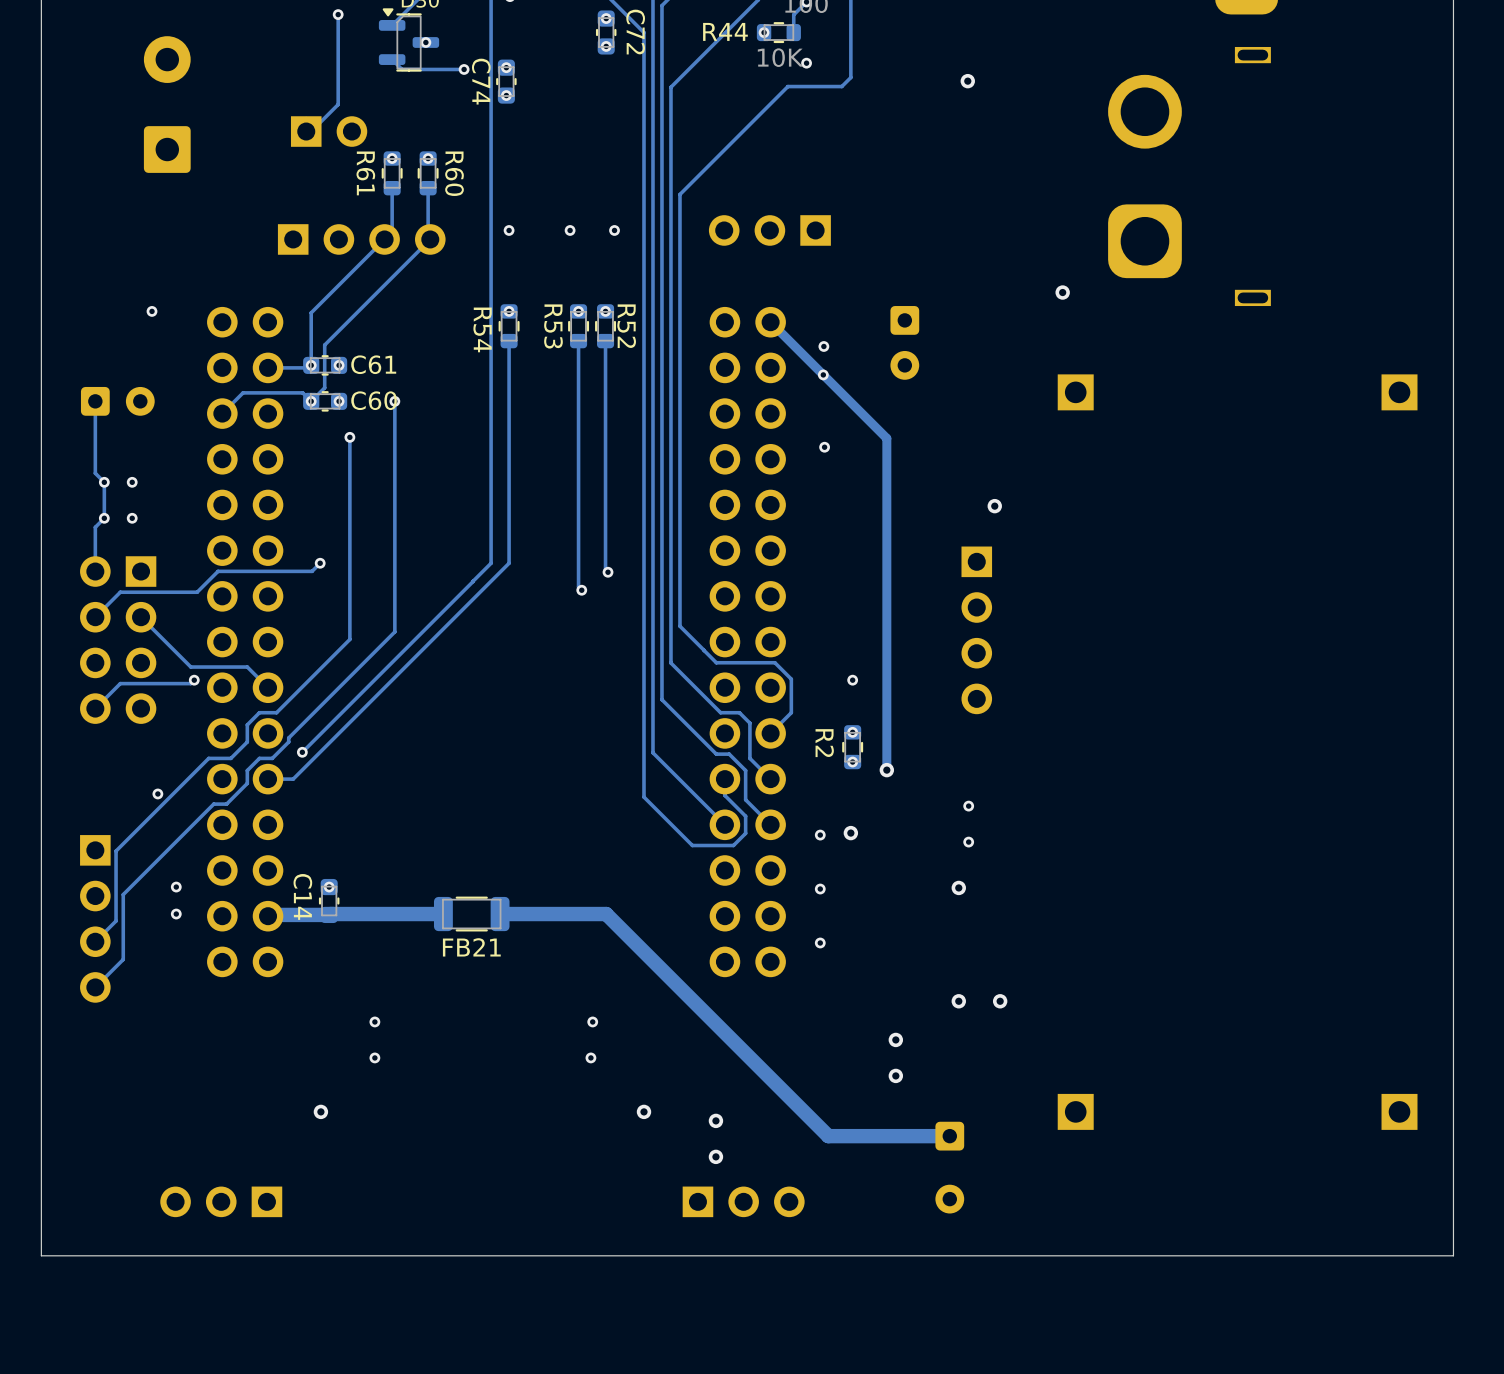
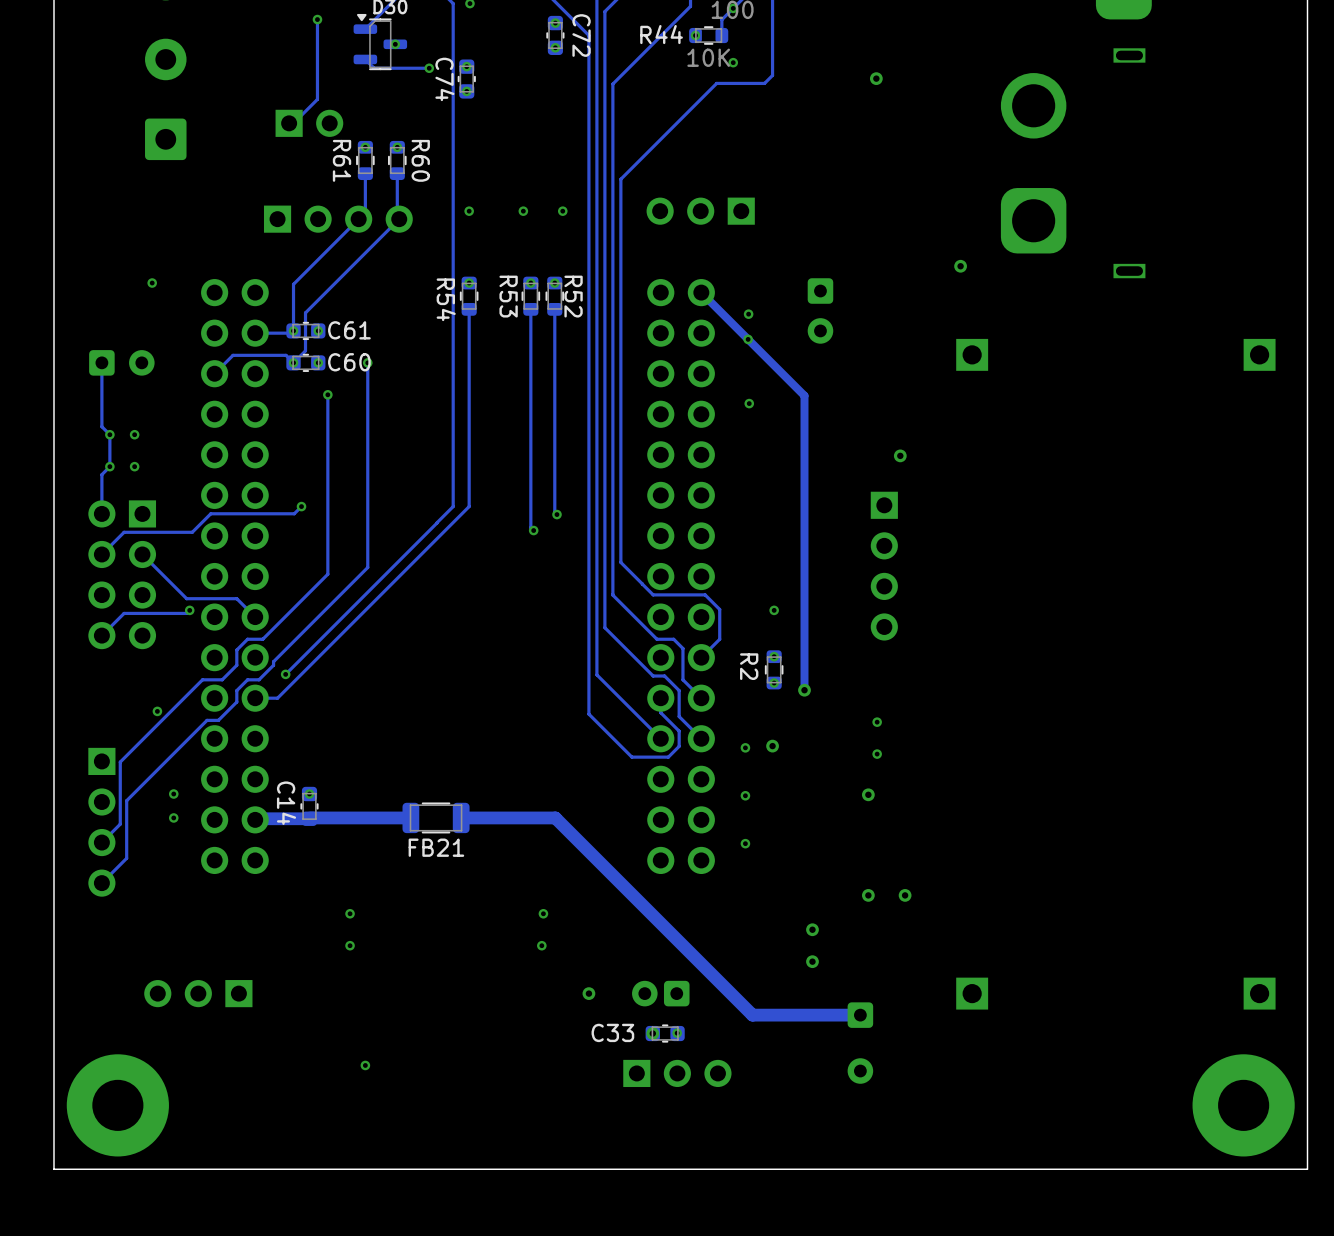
via: (320, 1111) -> none
part: none -> (660, 993)
via: (715, 1120) -> none
C33: none -> (665, 1033)
via: none -> (677, 1033)
via: none -> (365, 1065)
part position: (221, 1201) -> (198, 993)
part: none -> (117, 1105)
part: none -> (1243, 1105)
board edge: (1453, 1255) (41, 1255) -> (1307, 1121) (1307, 1169) (53, 1169) (53, 1121)

